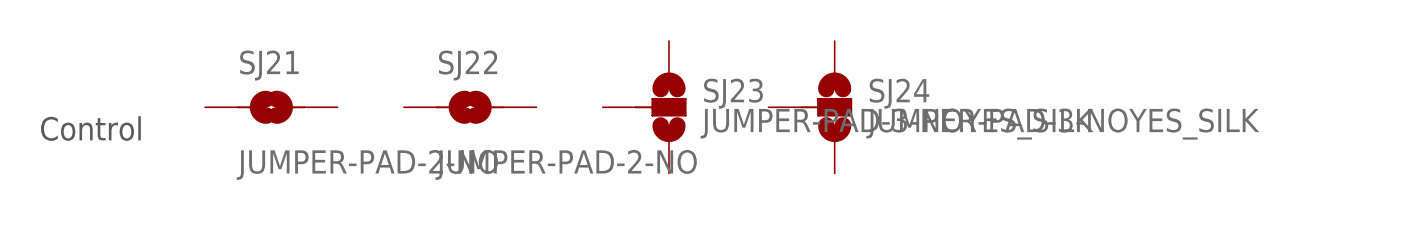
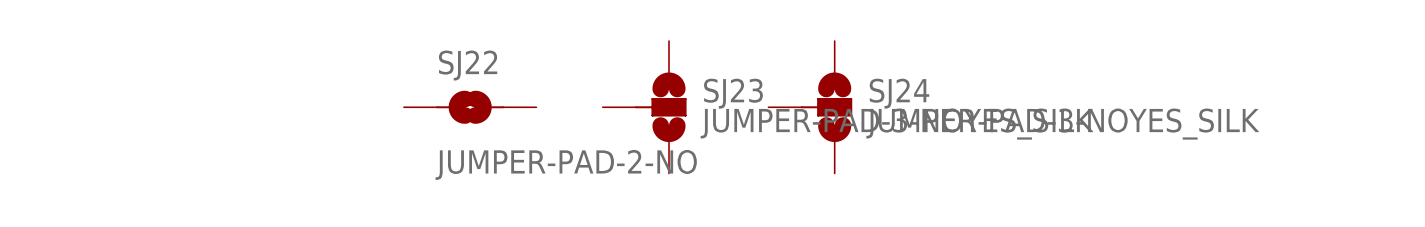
SJ21: JUMPER-PAD-2-NO (271, 107) -> none
text: Control (90, 128) -> none

